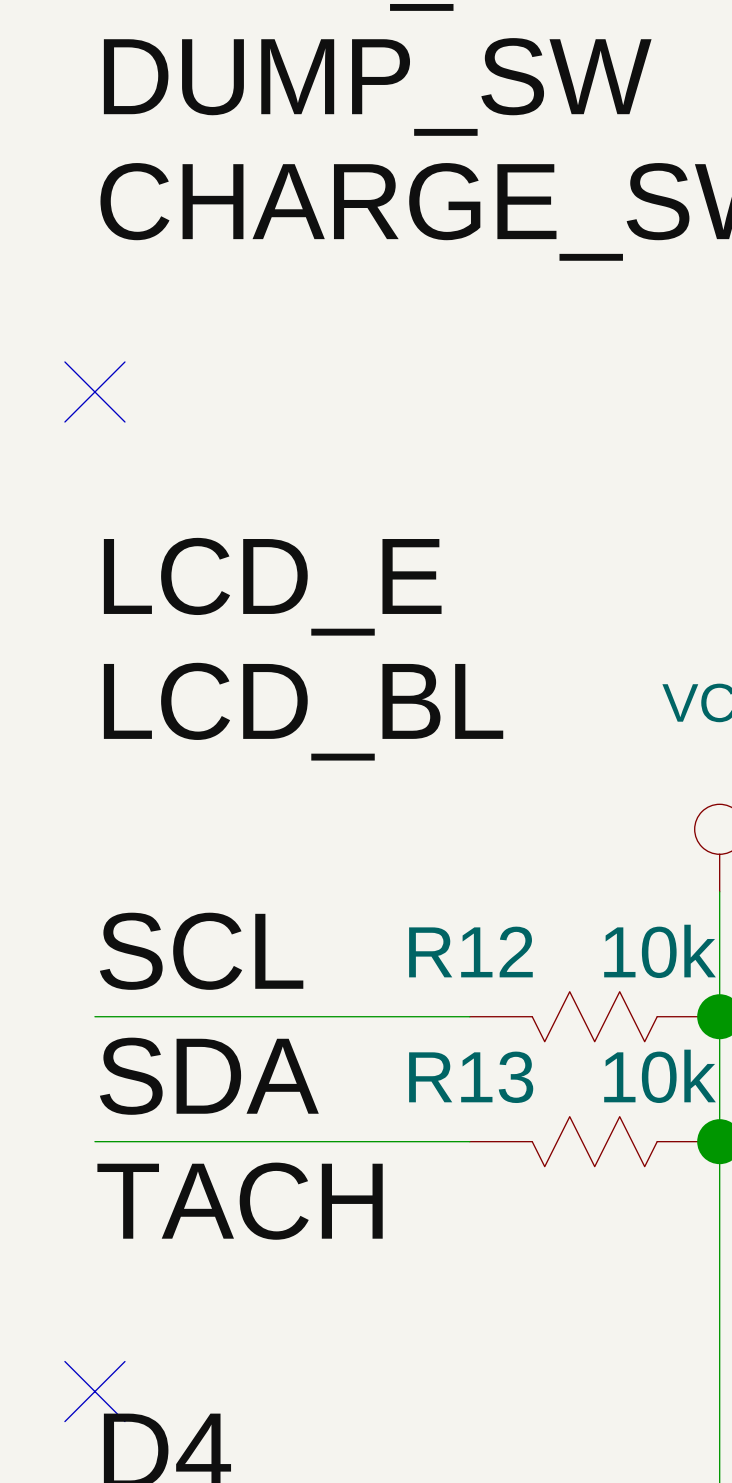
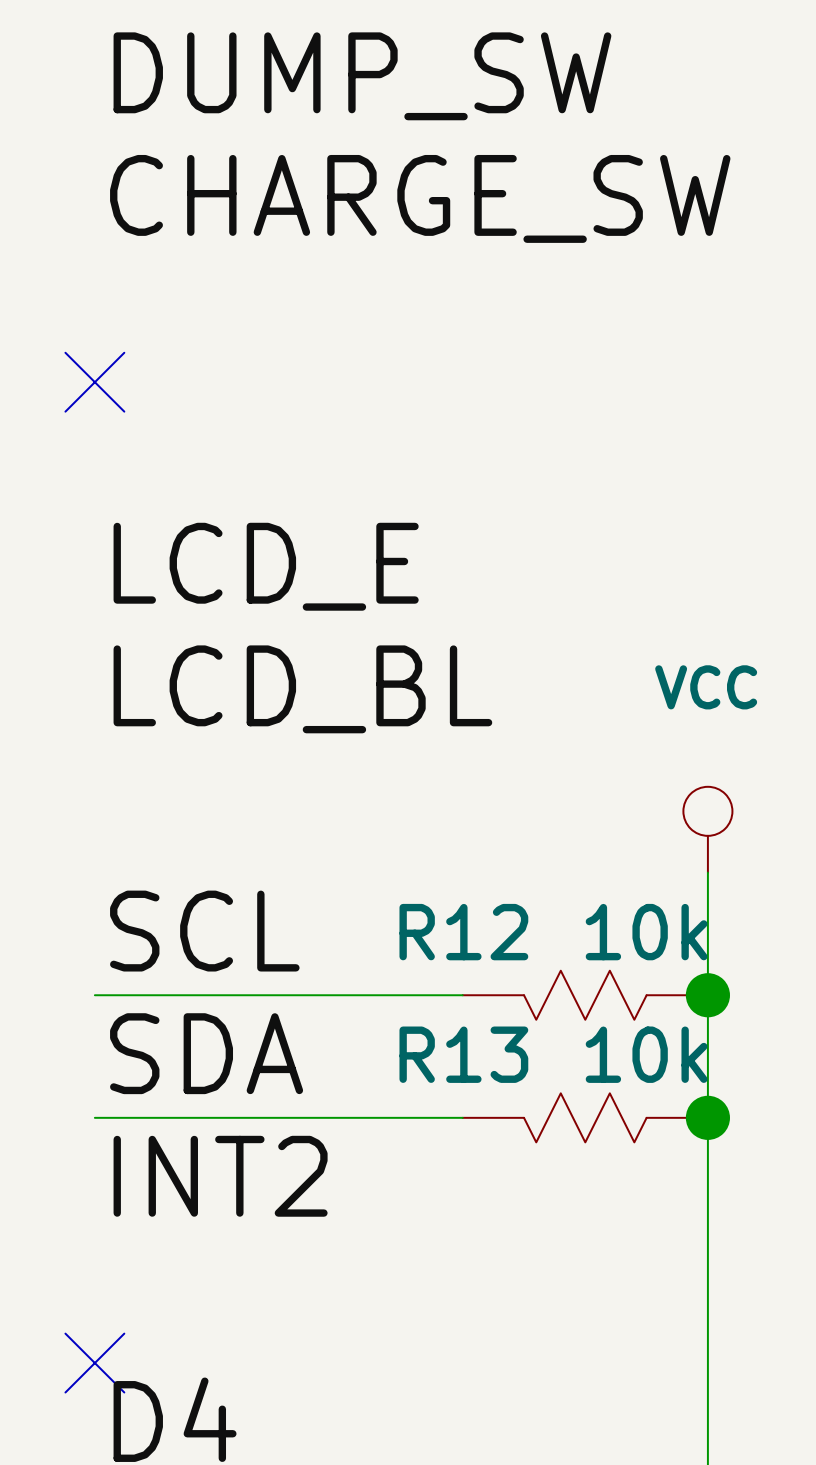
label: TACH (240, 1201) -> INT2 (220, 1176)

